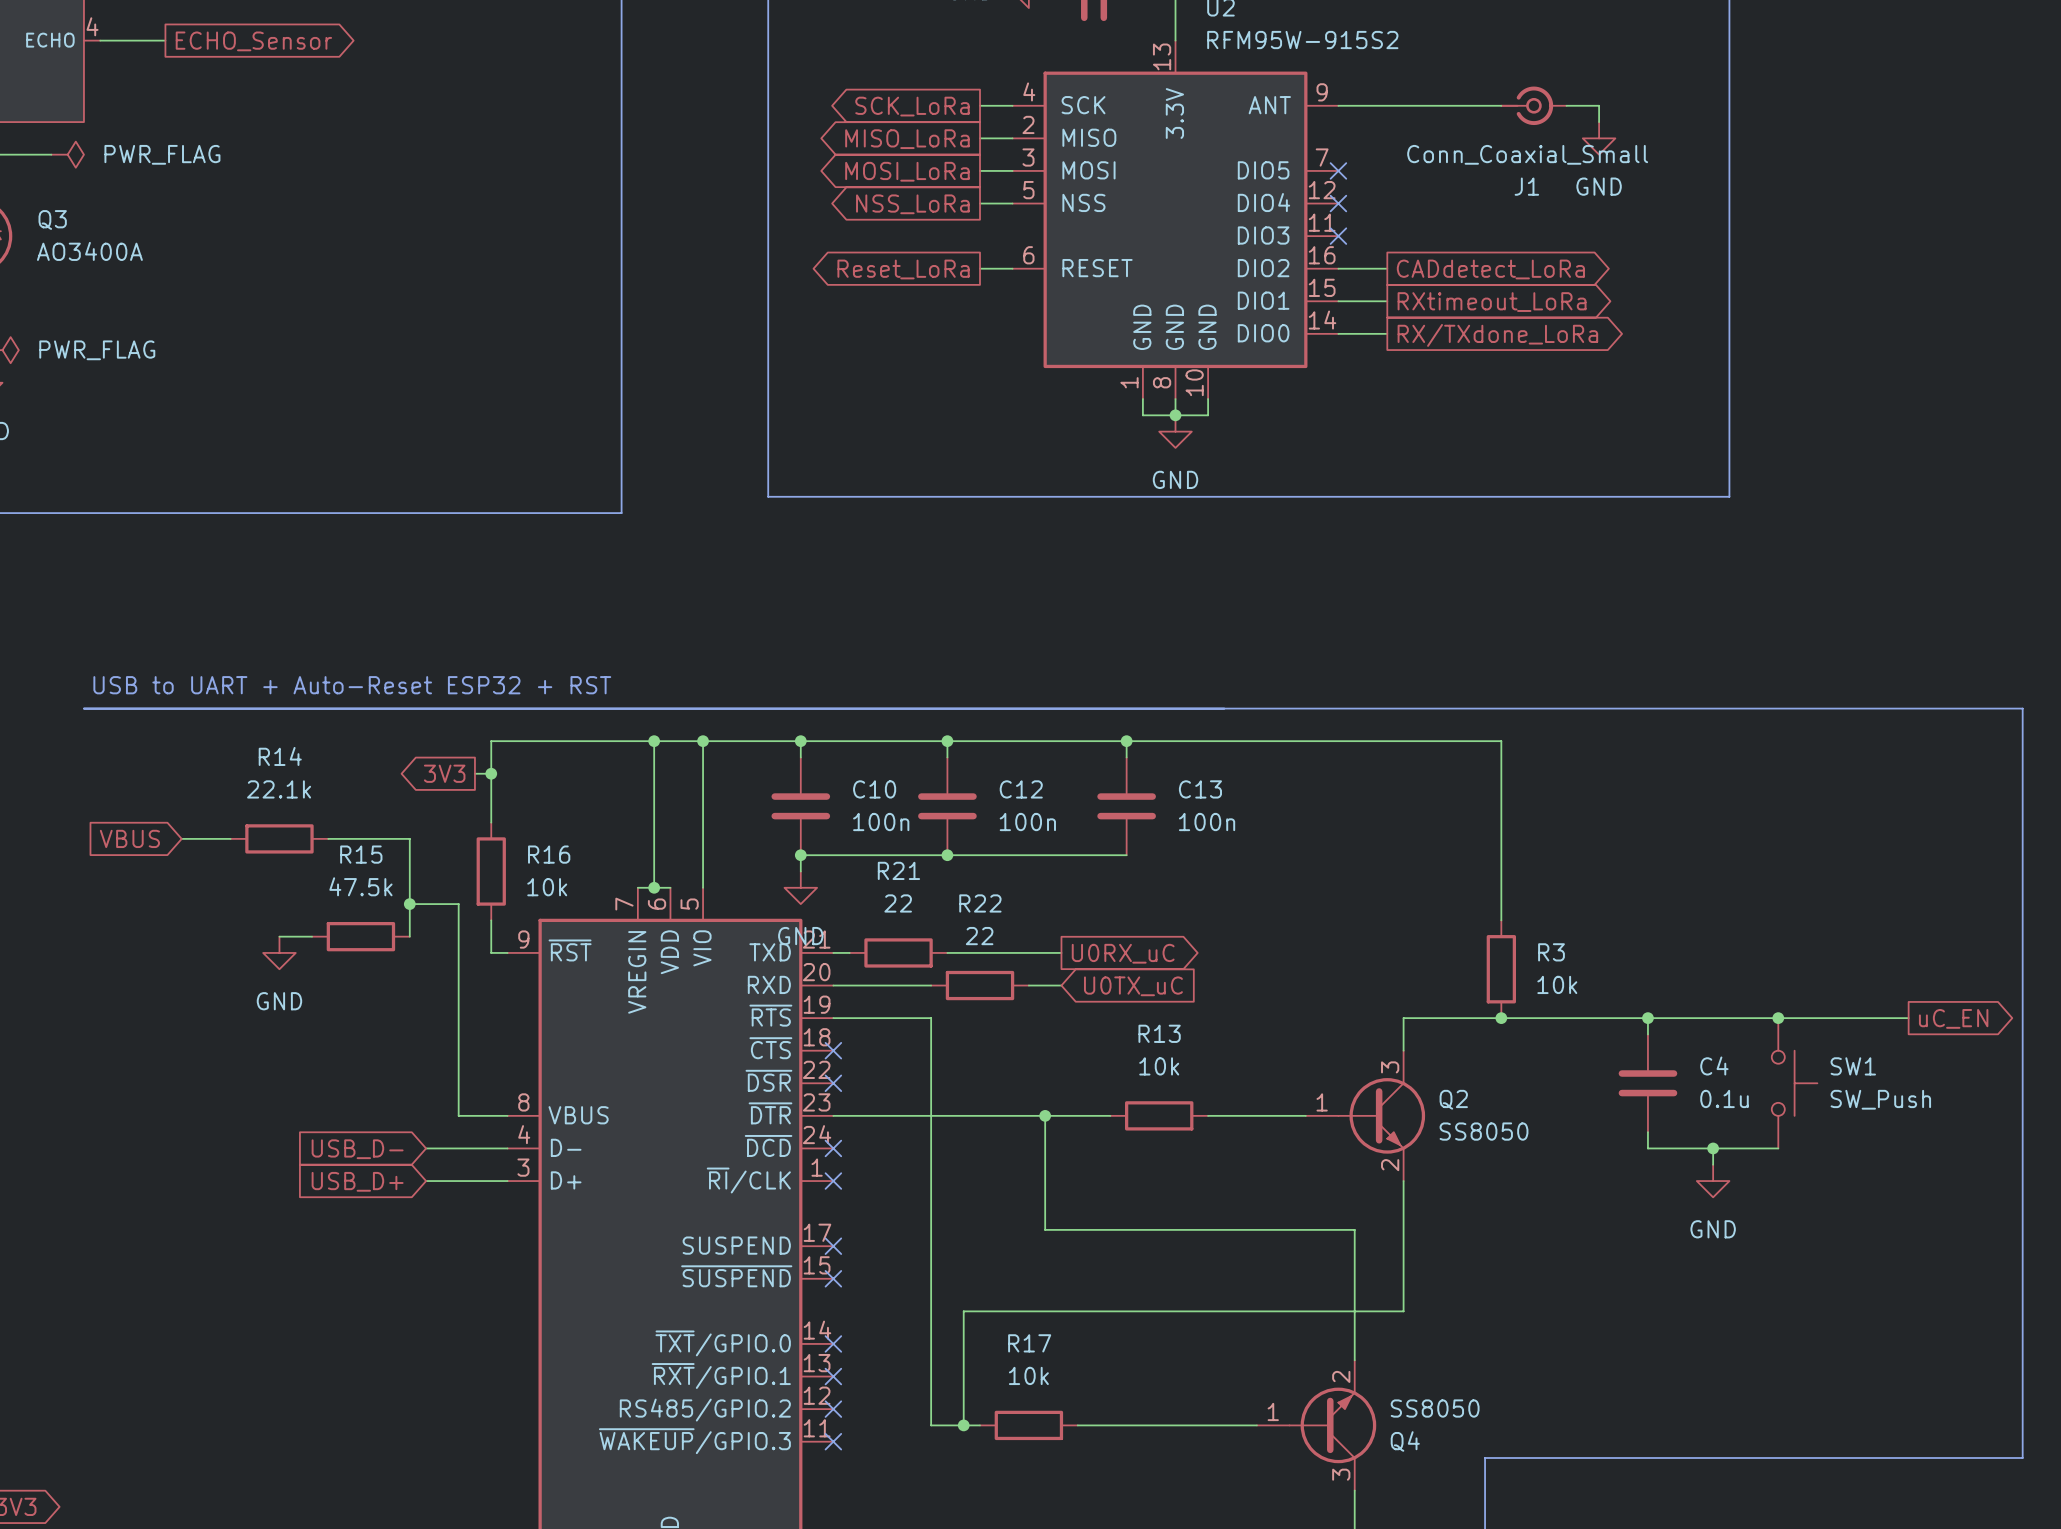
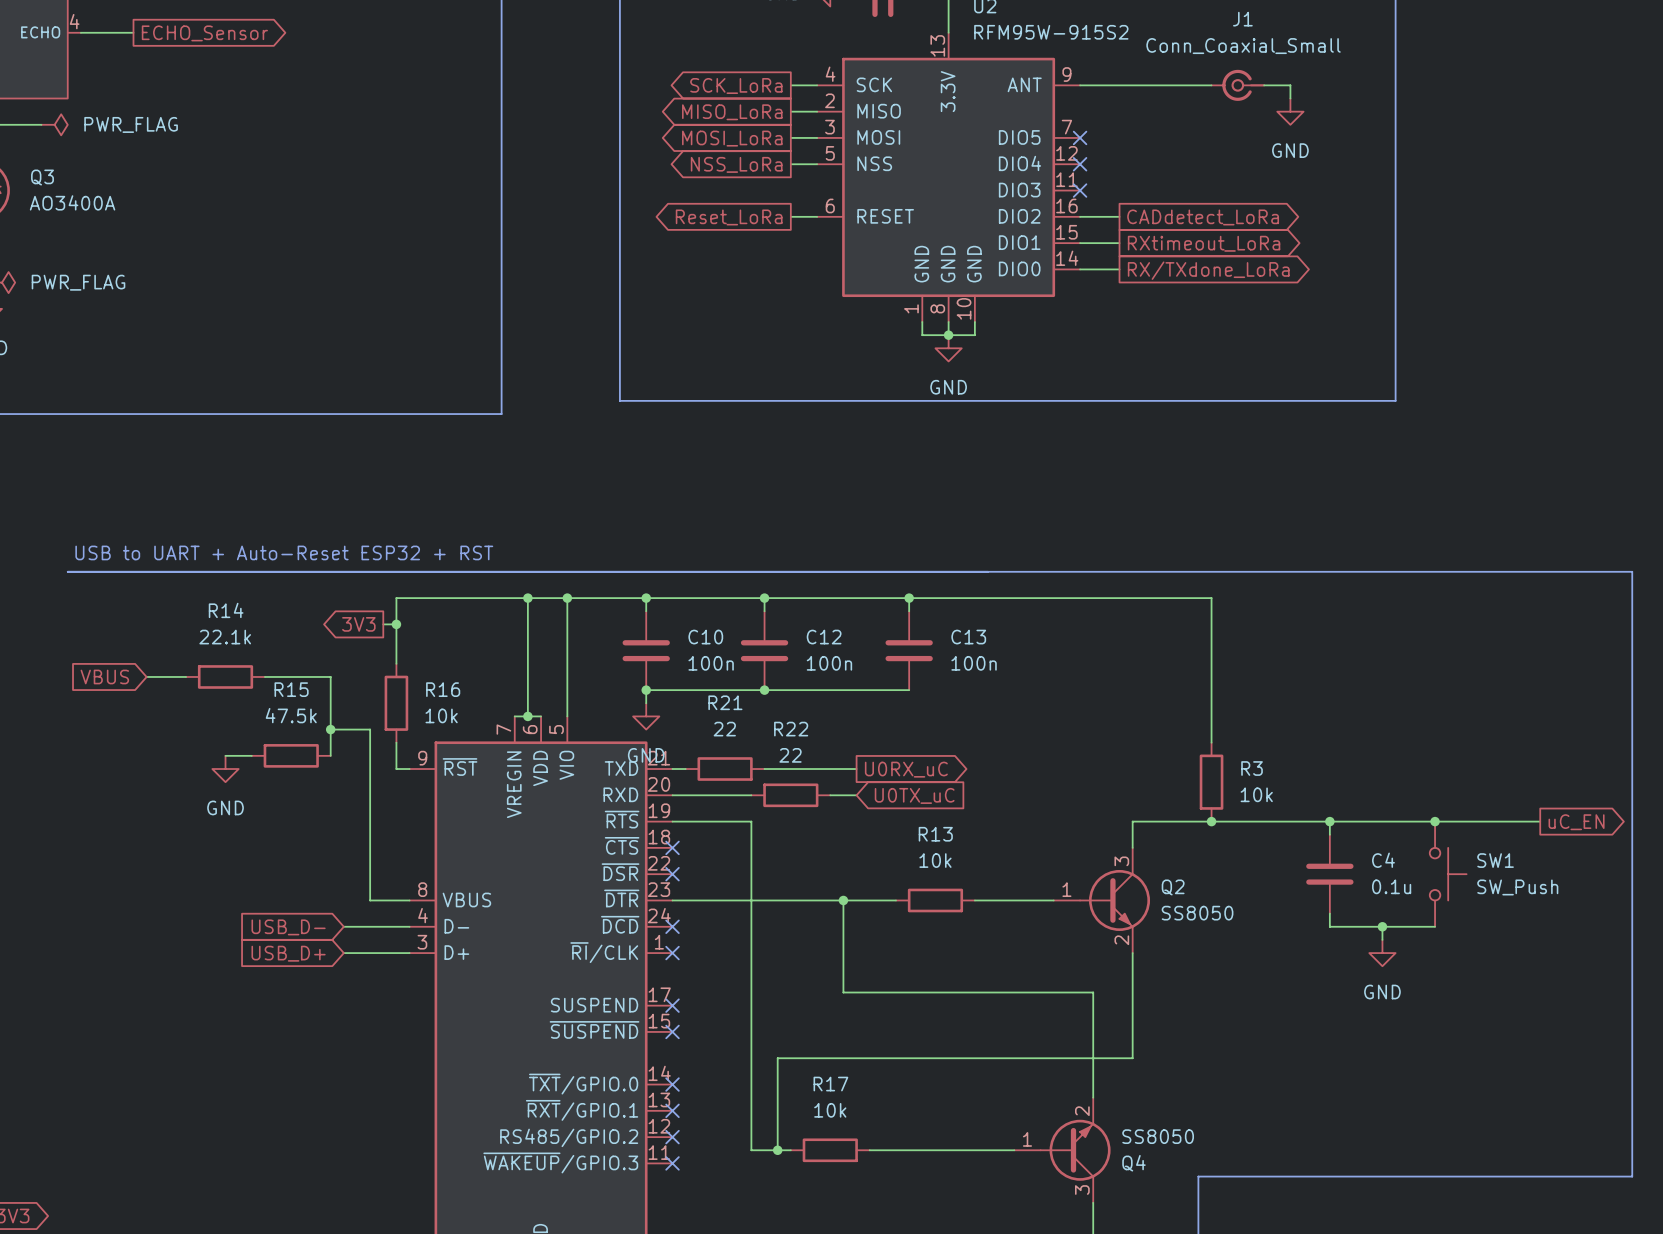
J1 rotation: 0° (1527, 105) -> 180° (1243, 85)

